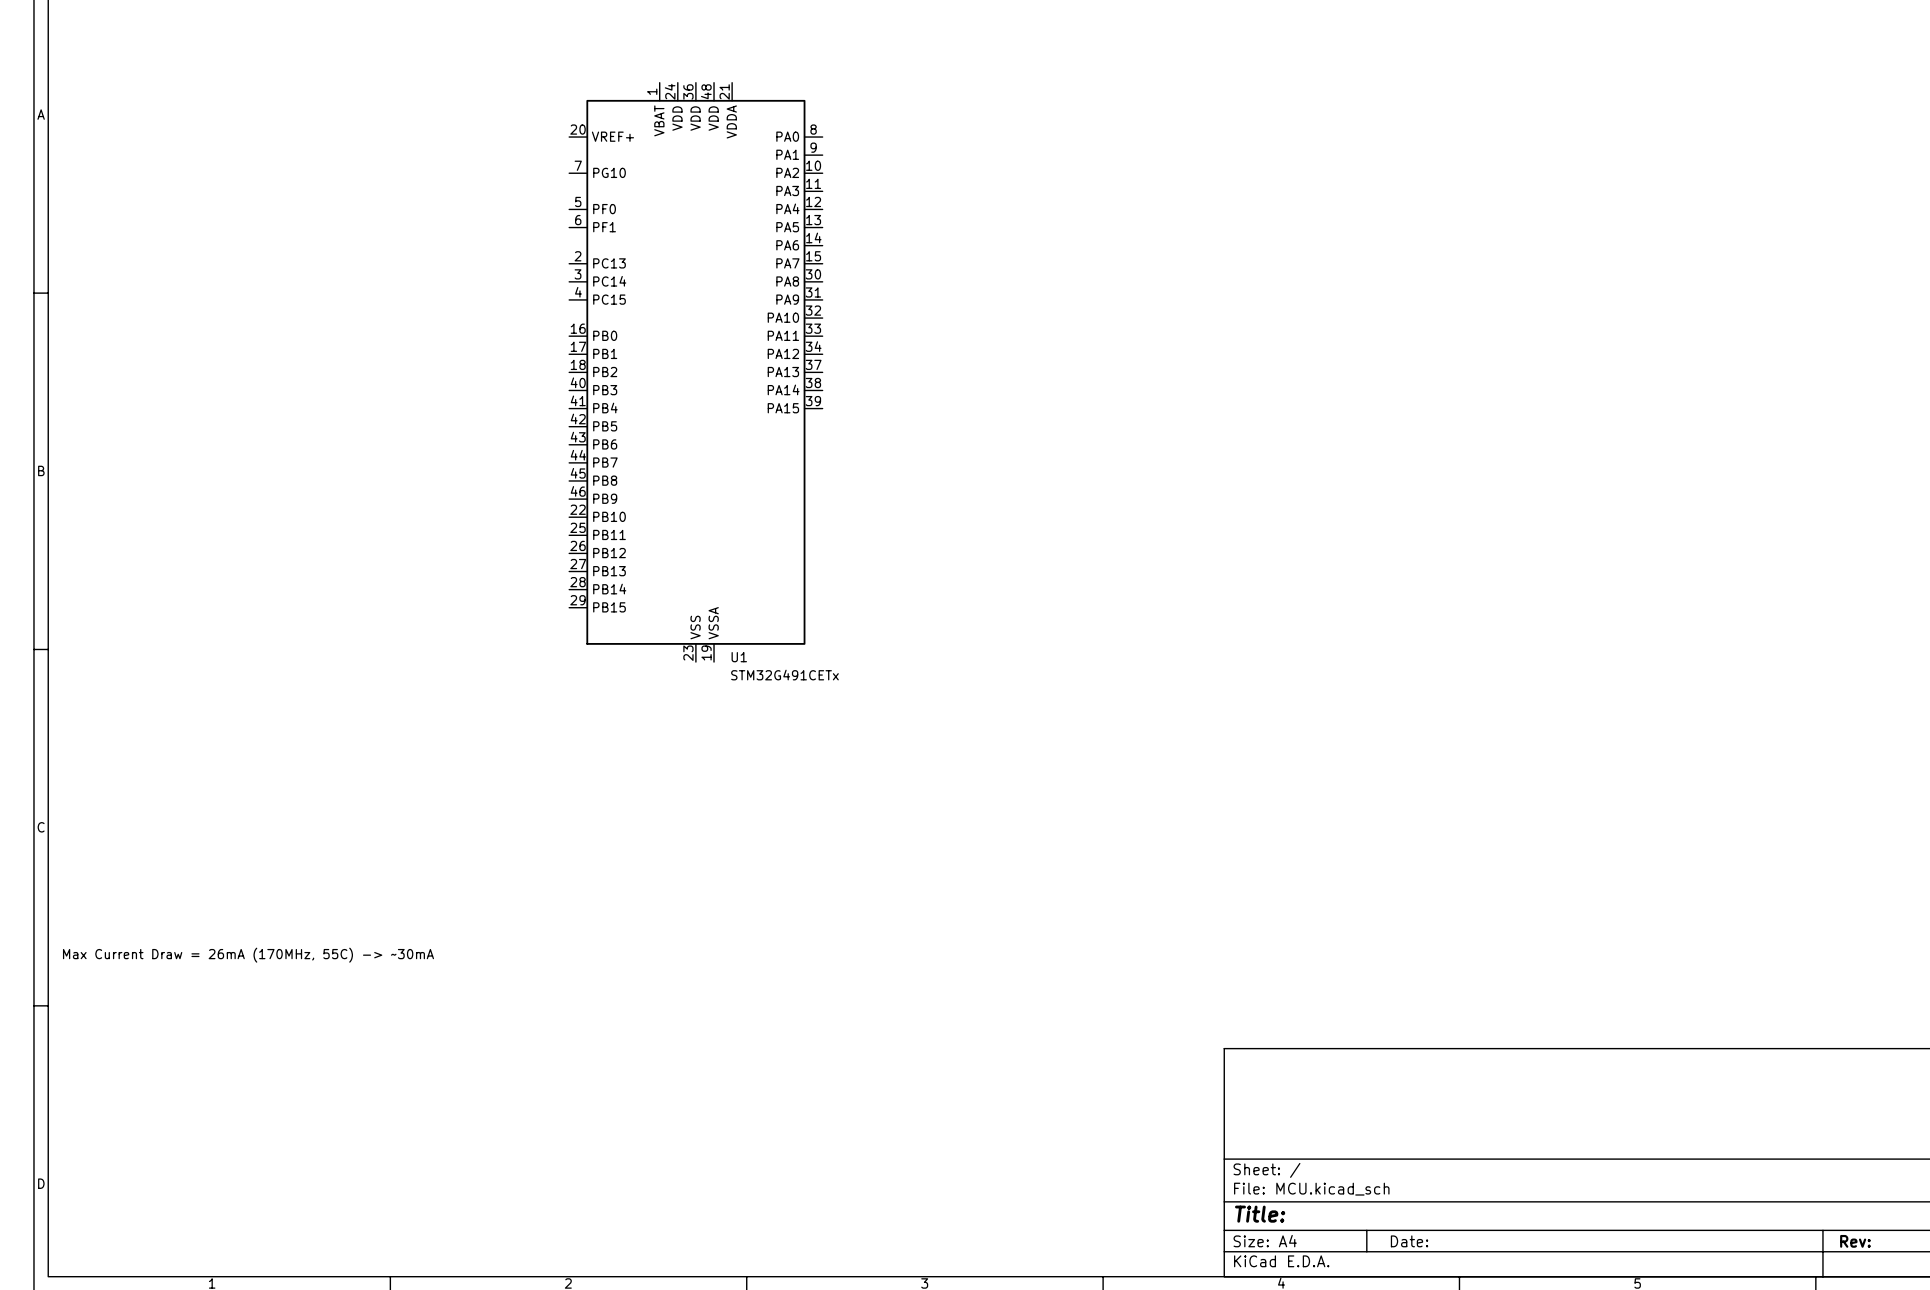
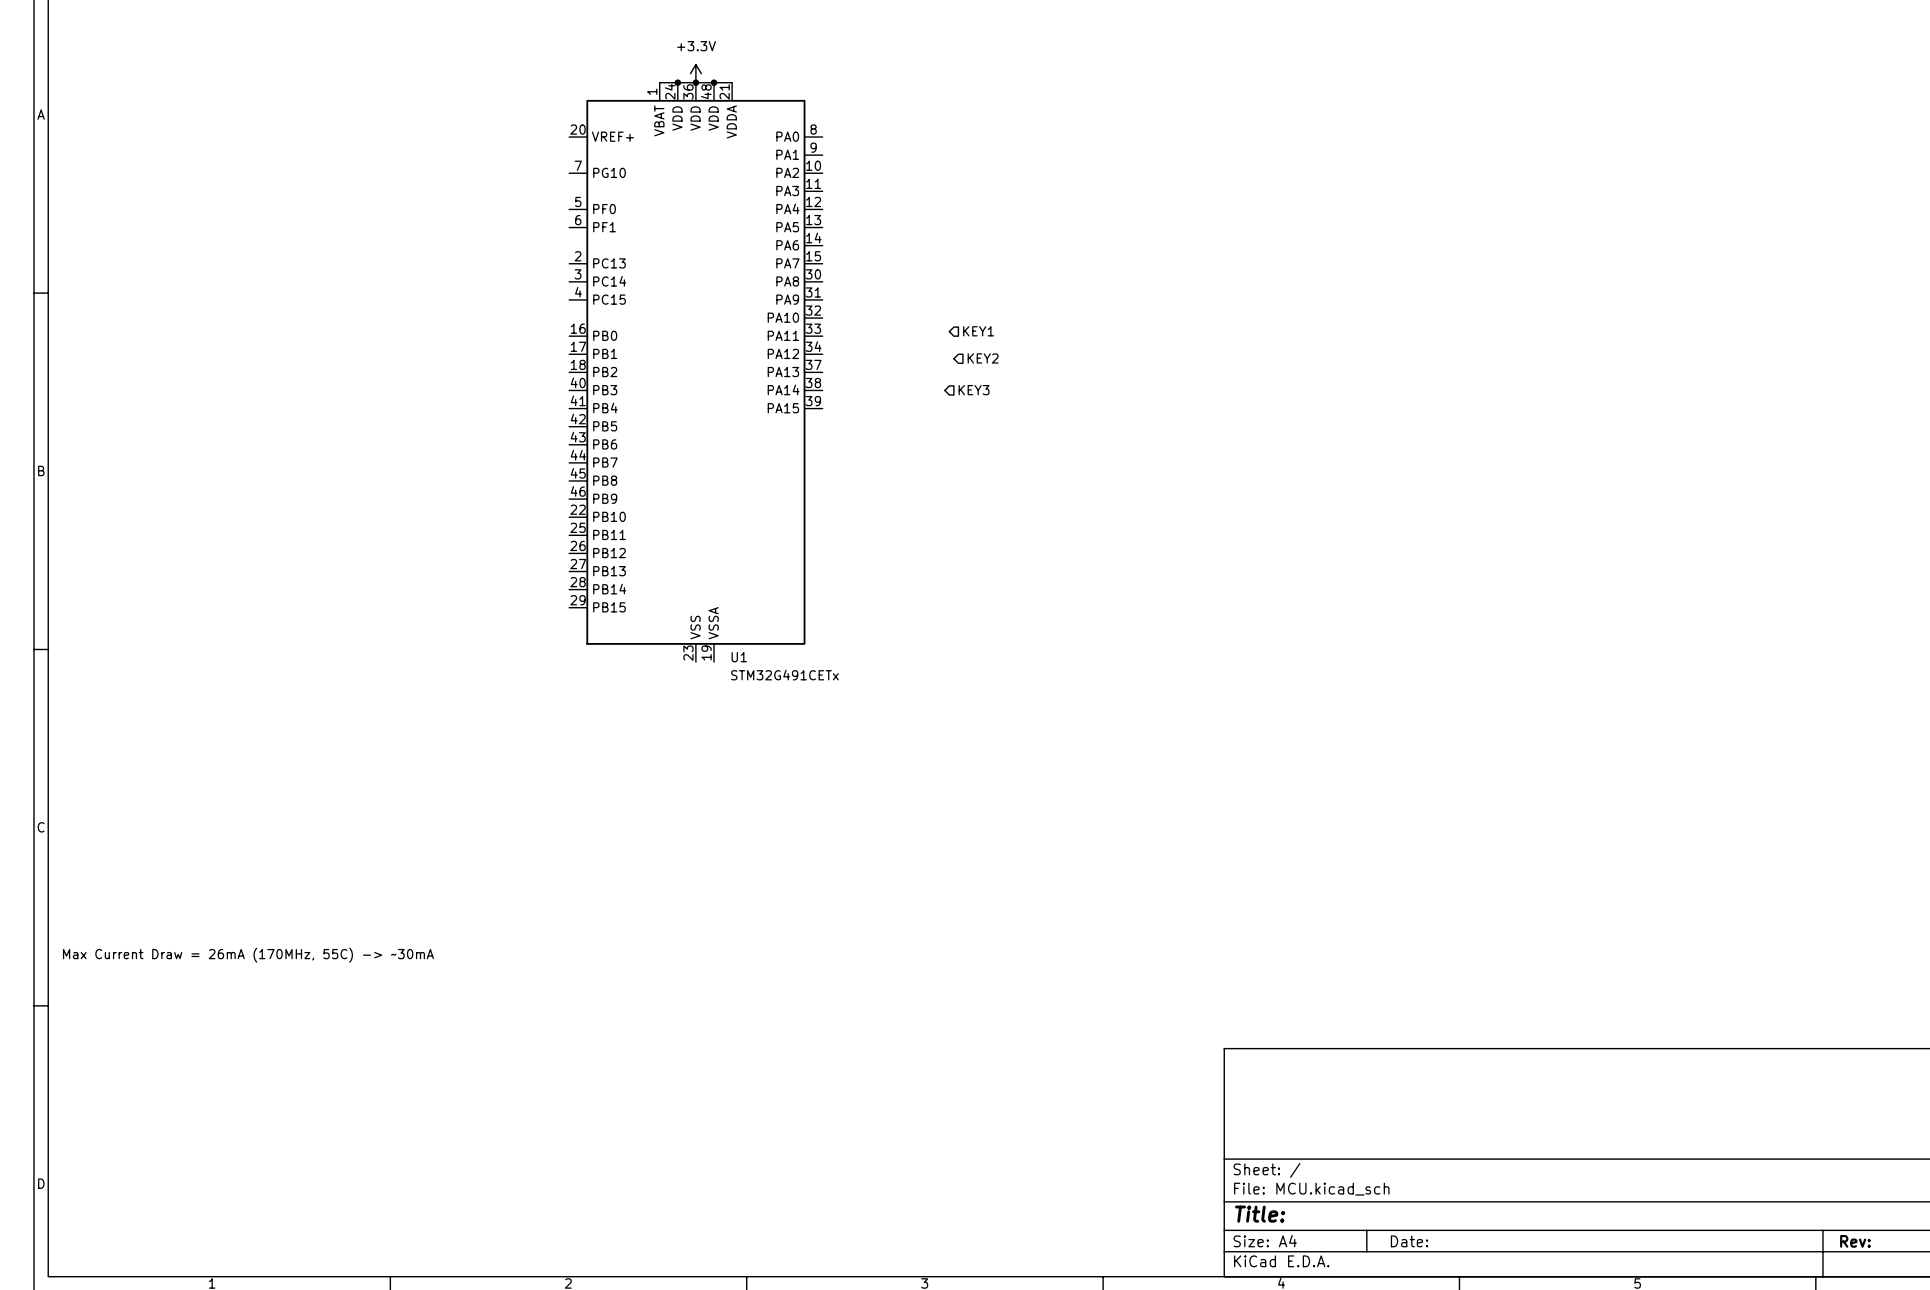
power symbol: none -> +3.3V (695, 73)
wire: none -> (659, 82) (732, 82)
junction: none -> (677, 82)
junction: none -> (695, 82)
junction: none -> (714, 82)
hierarchical label: none -> KEY1 (978, 331)
hierarchical label: none -> KEY2 (983, 358)
hierarchical label: none -> KEY3 (974, 390)

